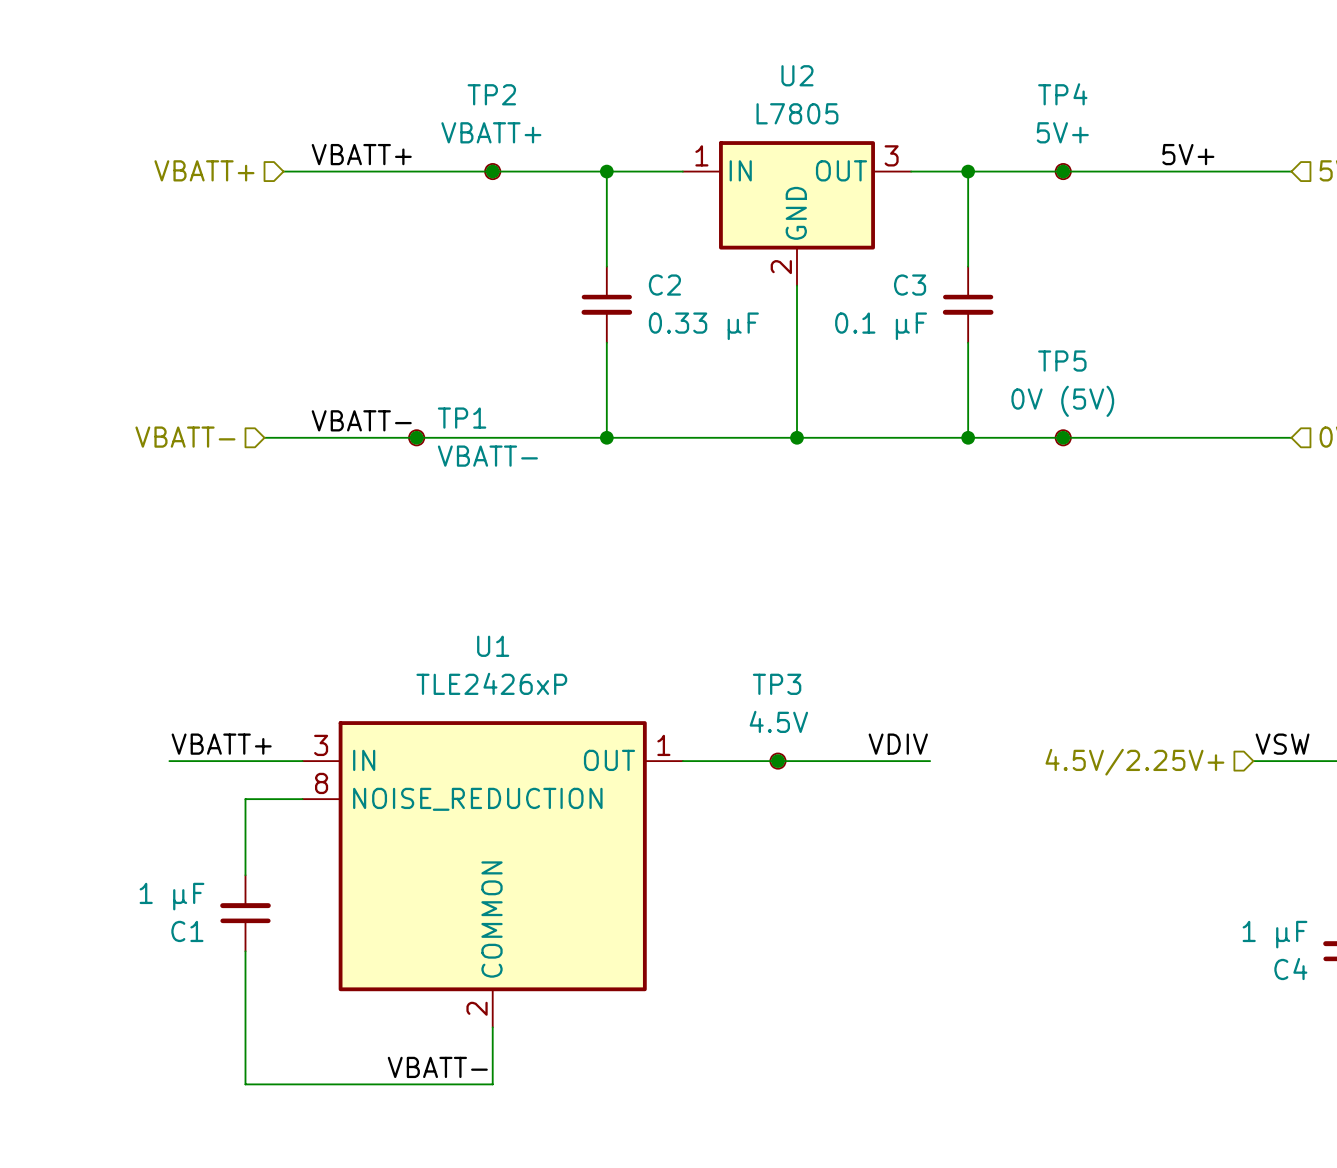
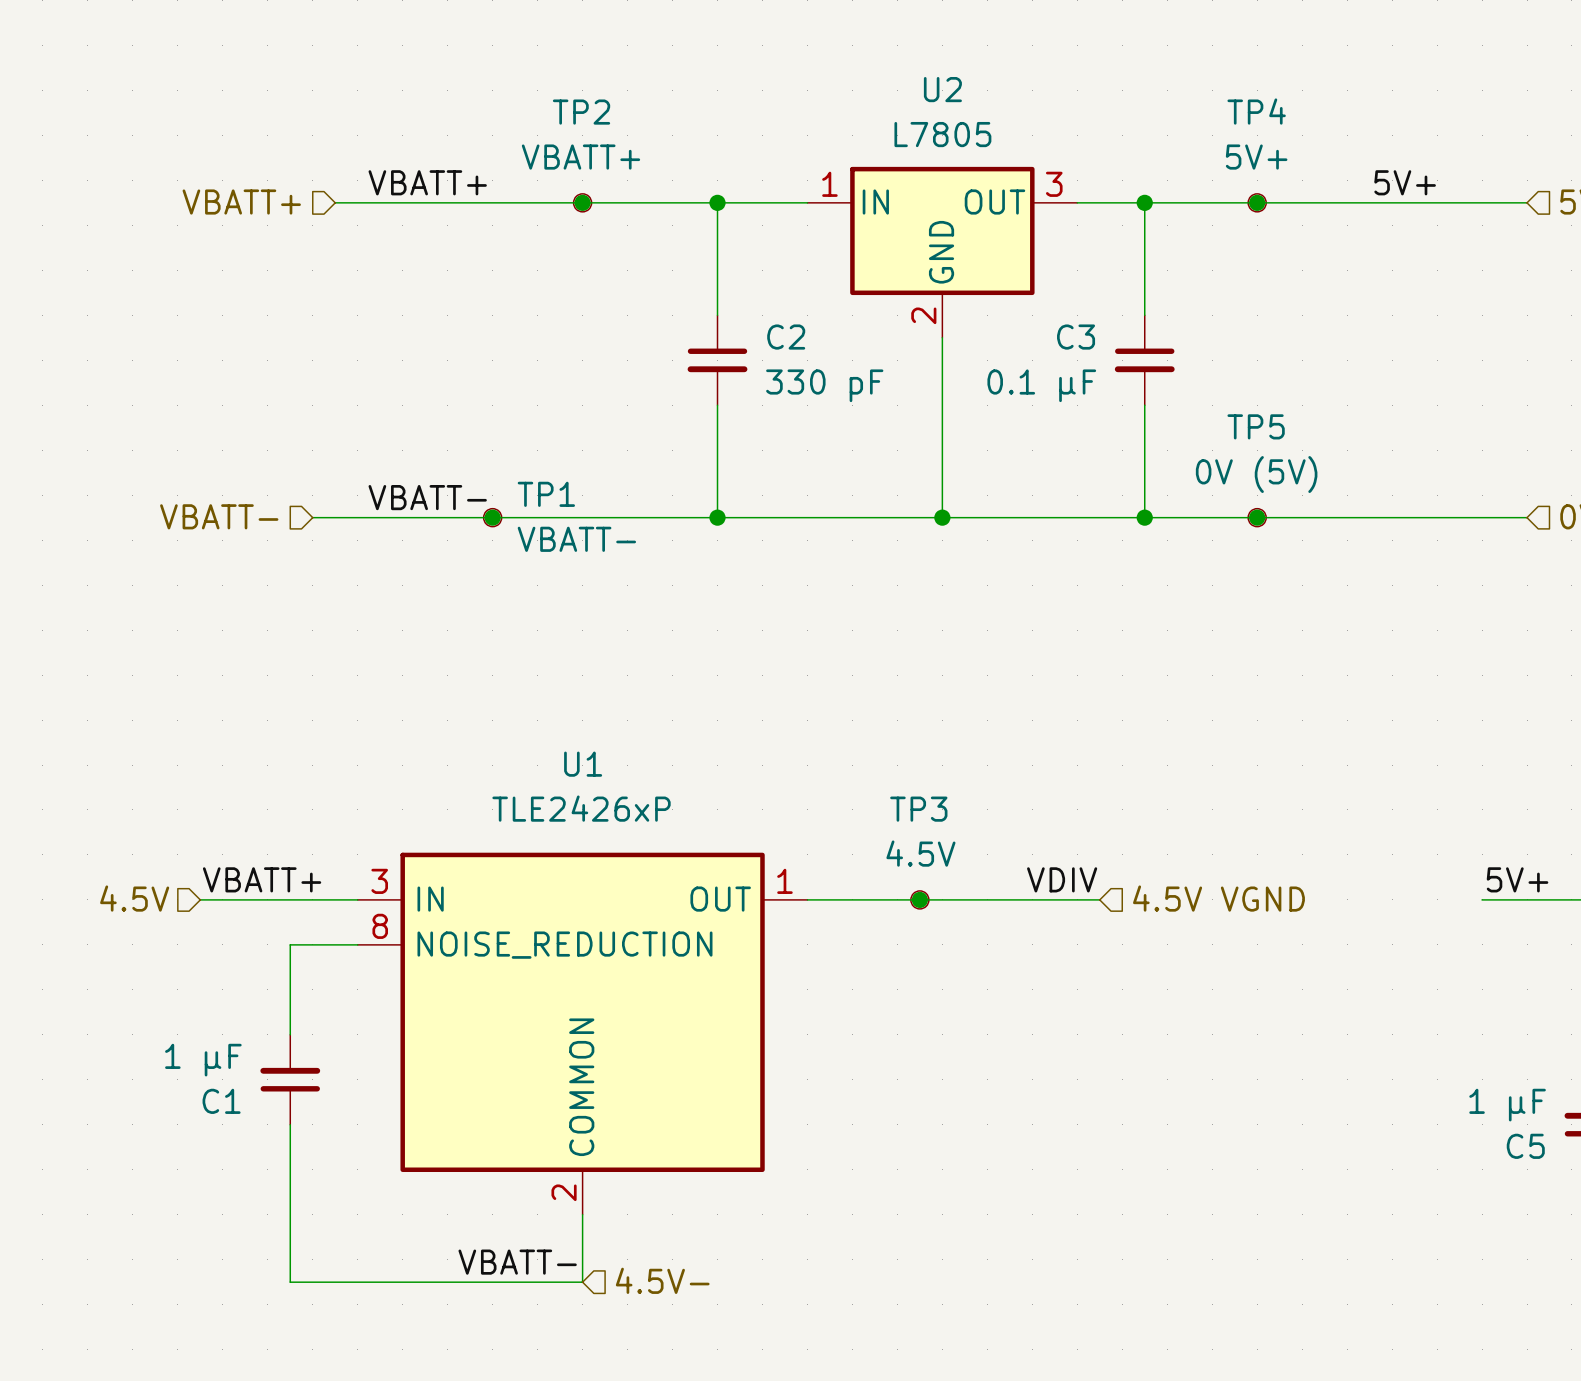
C2 value: 0.33 µF (703, 326) -> 330 pF (824, 385)
label: VSW (1282, 744) -> 5V+ (1517, 879)
hierarchical label: none -> 4.5V (134, 898)
hierarchical label: none -> 4.5V VGND (1218, 898)
hierarchical label: 4.5V/2.25V+ (1134, 762) -> none
C4 name: C4 (1290, 969) -> C5 (1525, 1146)
hierarchical label: none -> 4.5V- (662, 1280)

